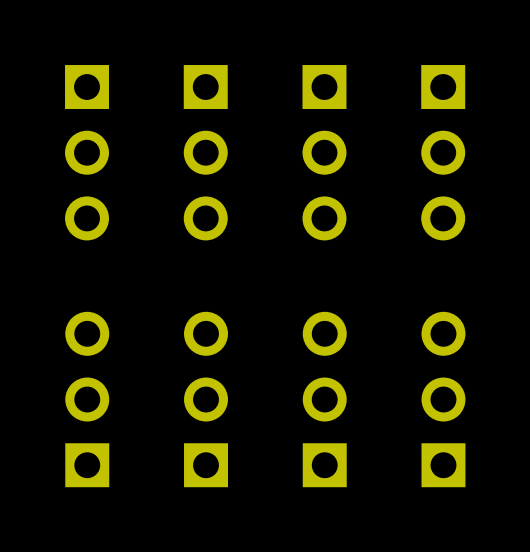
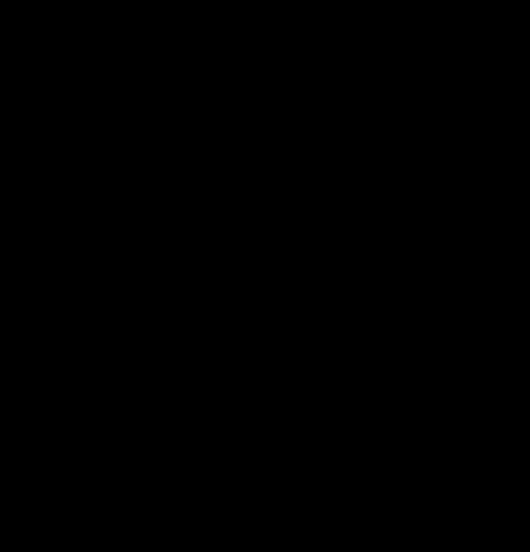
part: (87, 152) -> none
part: (205, 152) -> none
part: (324, 152) -> none
part: (443, 152) -> none
part: (87, 399) -> none
part: (206, 399) -> none
part: (324, 399) -> none
part: (443, 399) -> none

